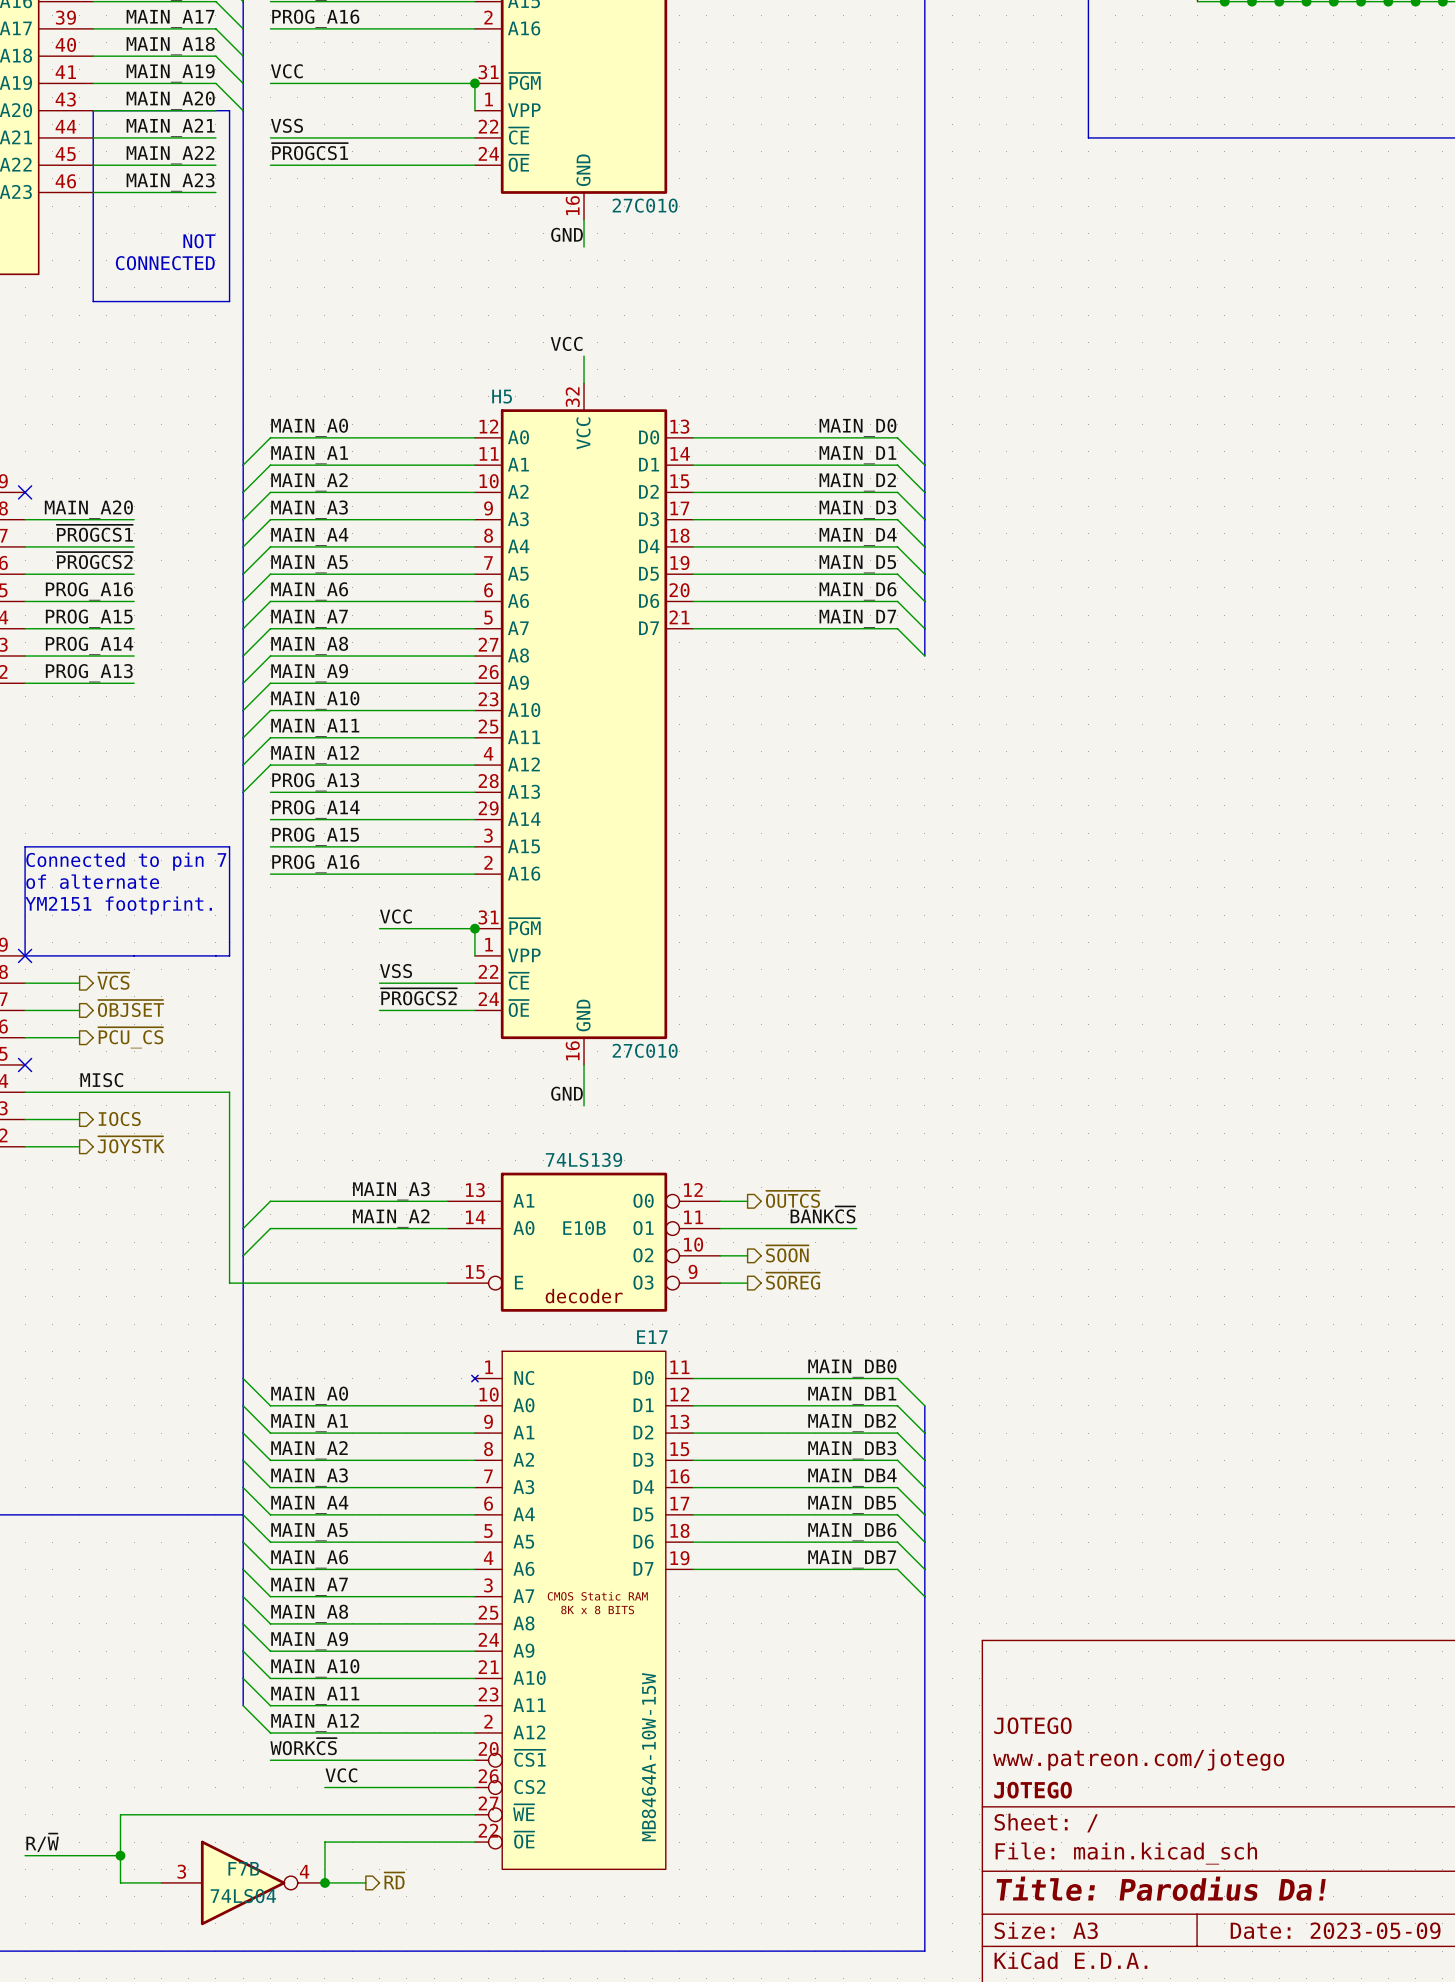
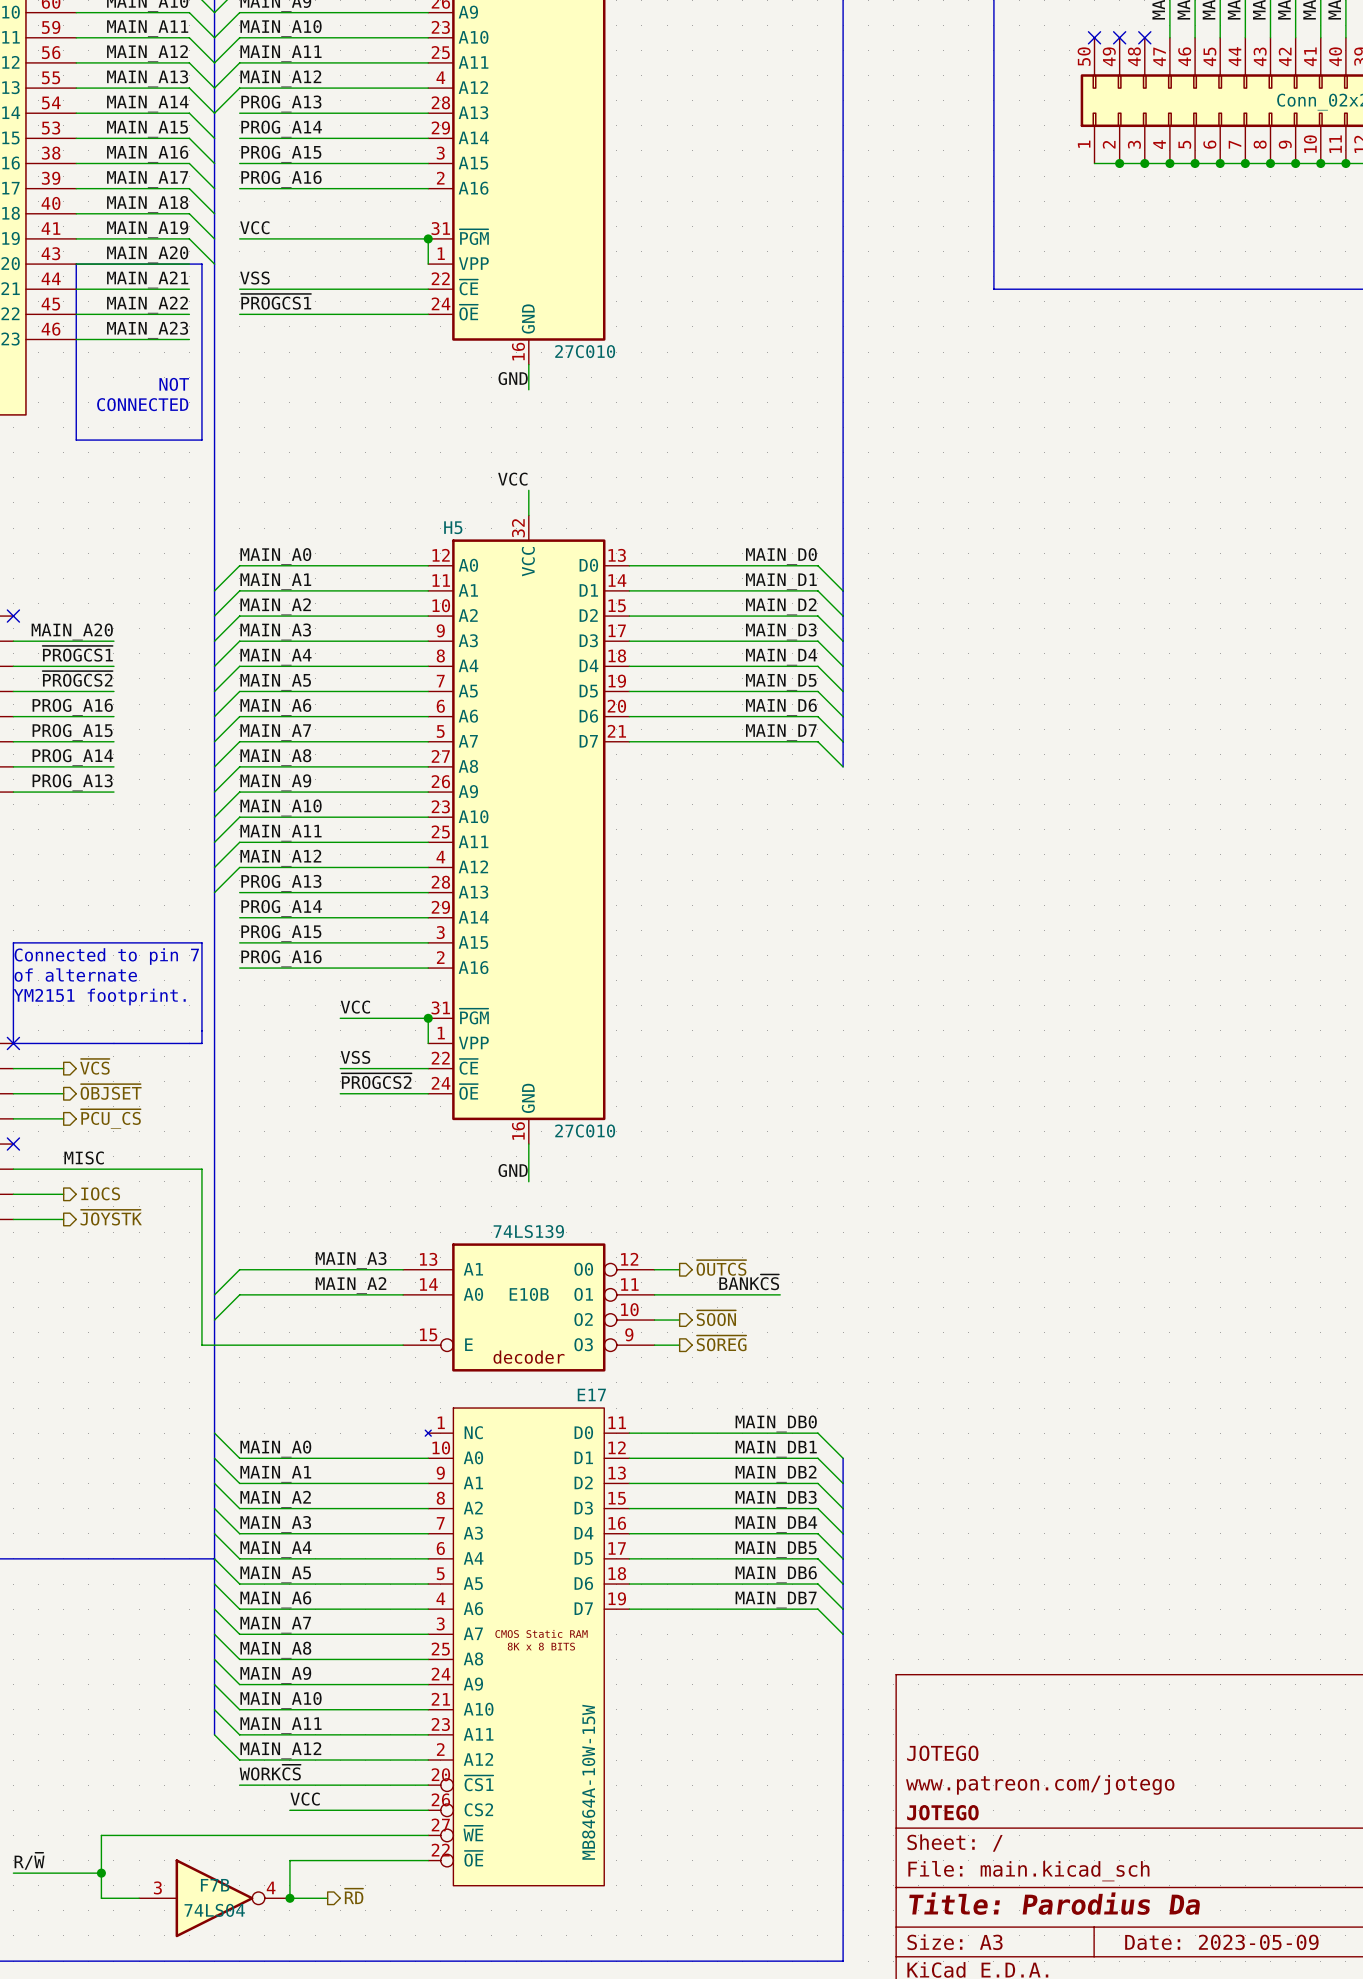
title block: Title: Parodius Da! (1161, 1888) -> Title: Parodius Da (1054, 1903)

